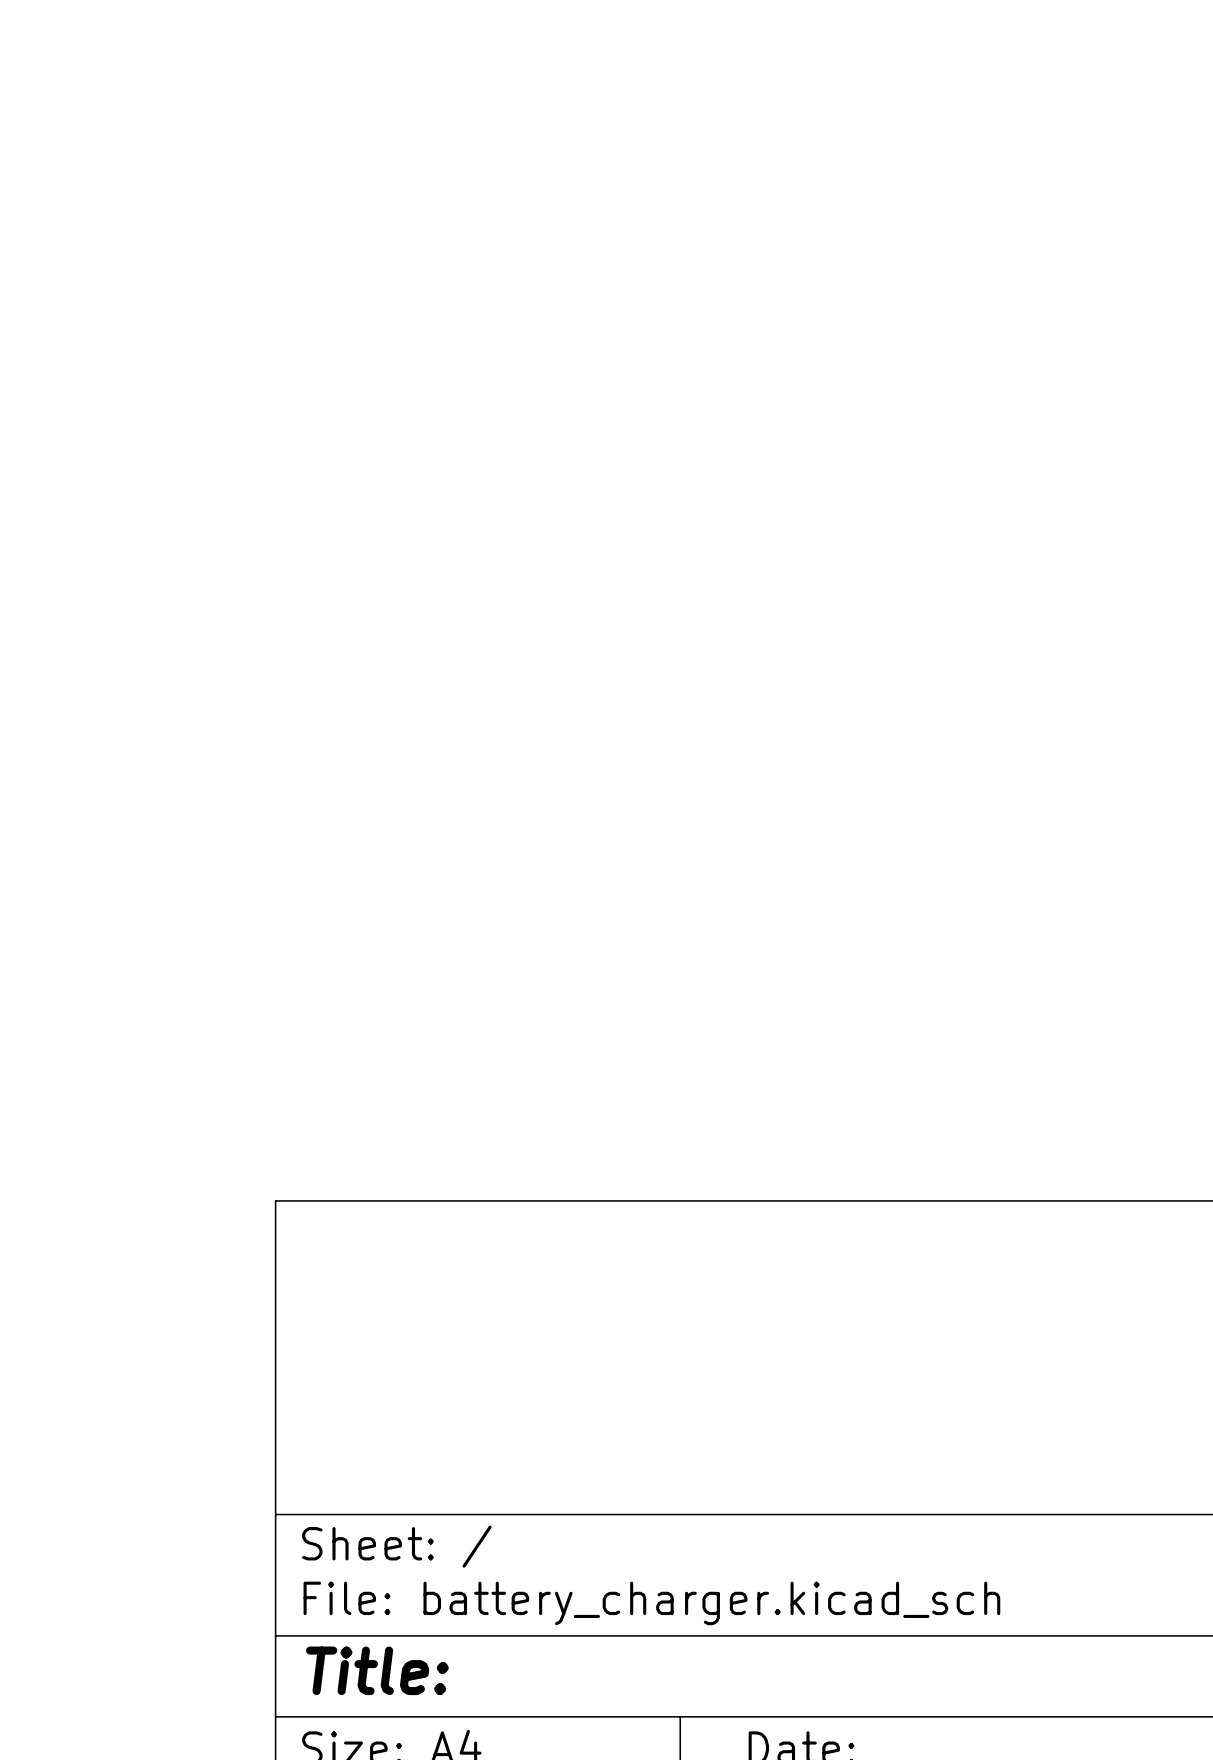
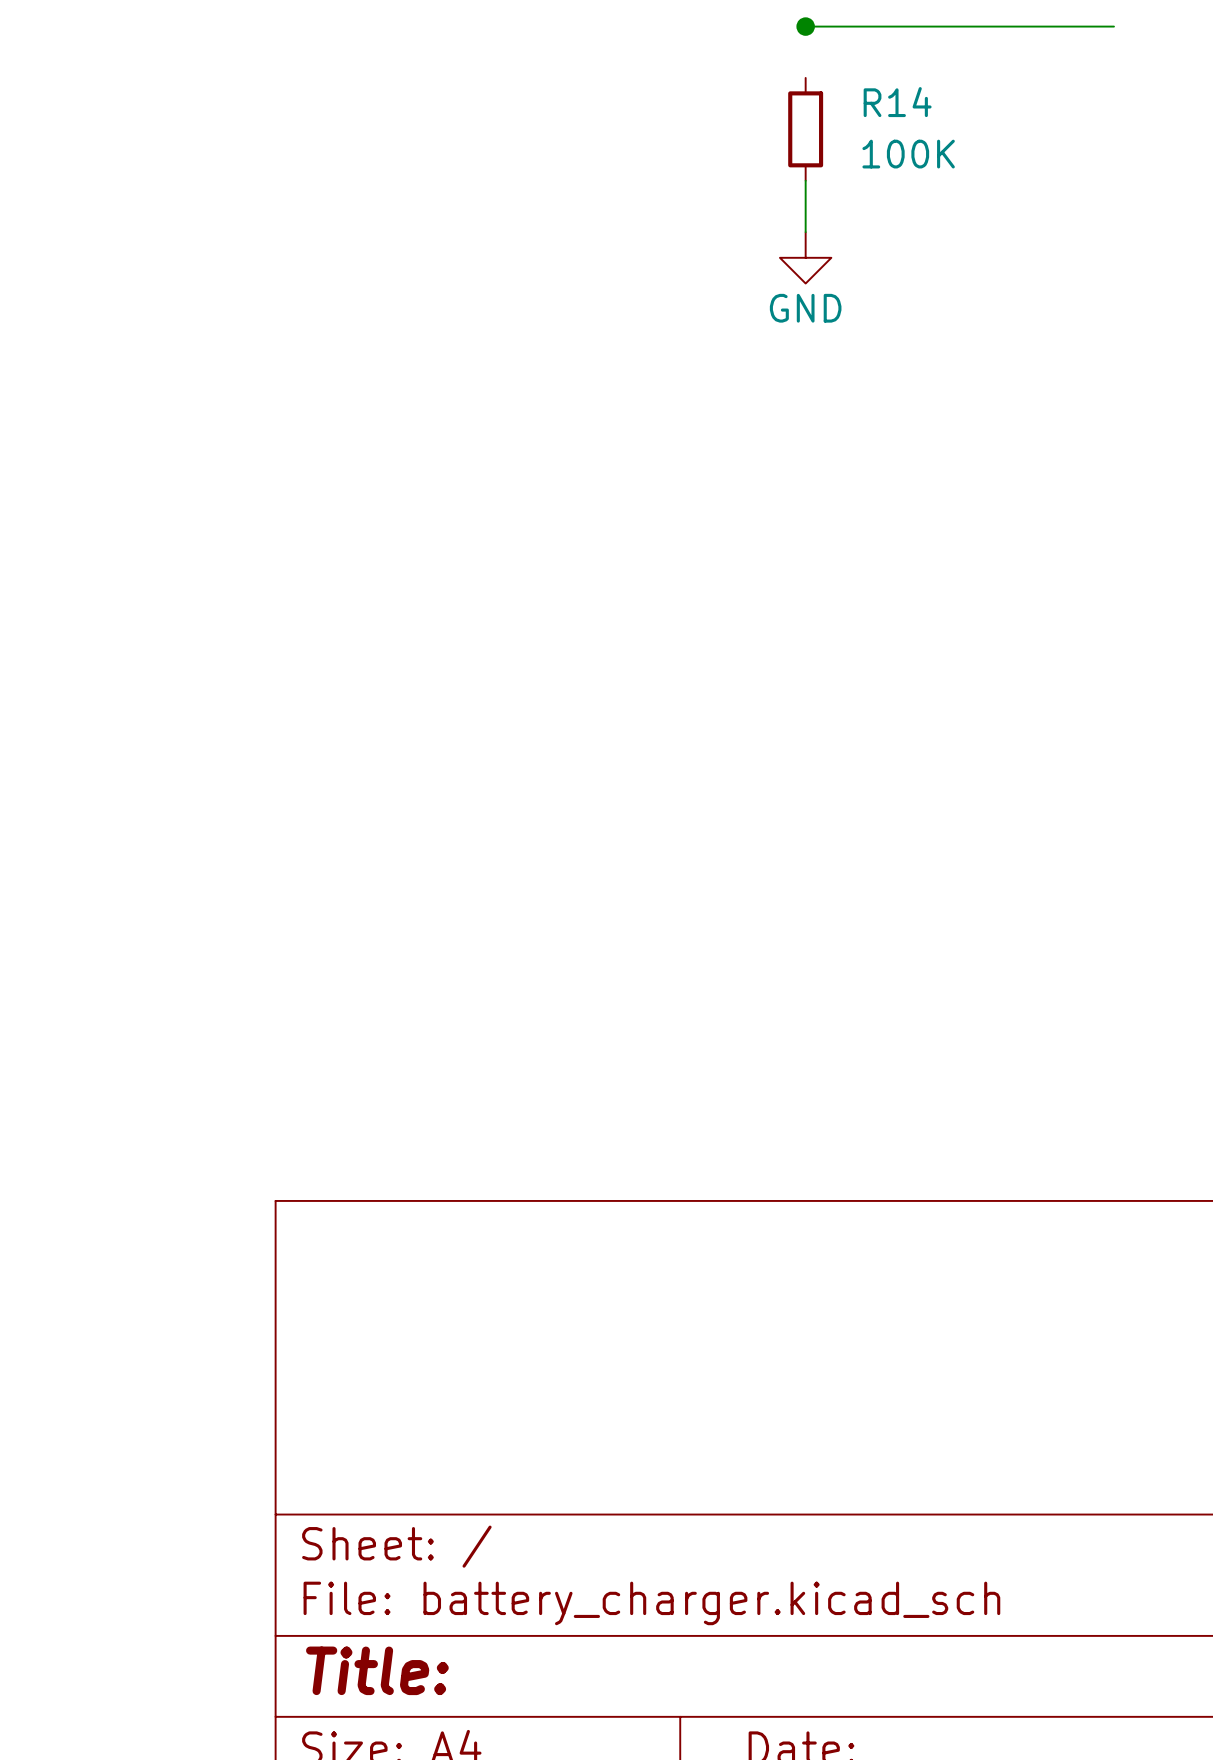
wire: none -> (805, 26) (1113, 26)
junction: none -> (805, 26)
R14: none -> 100K (805, 129)
wire: none -> (805, 180) (805, 232)
power symbol: none -> GND (805, 257)

